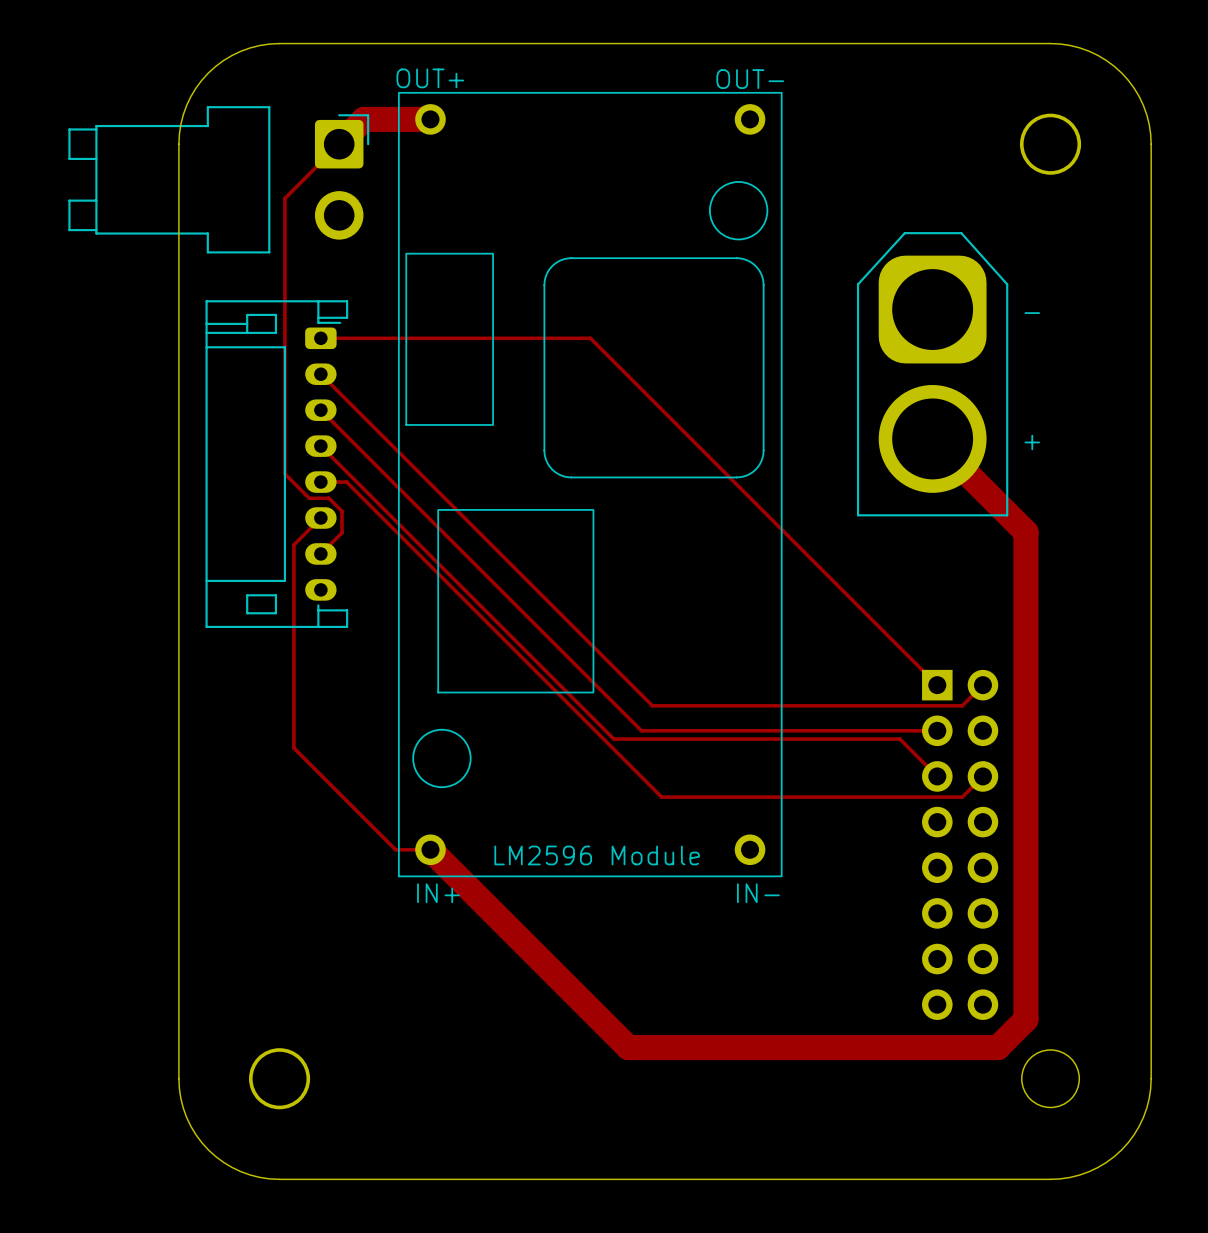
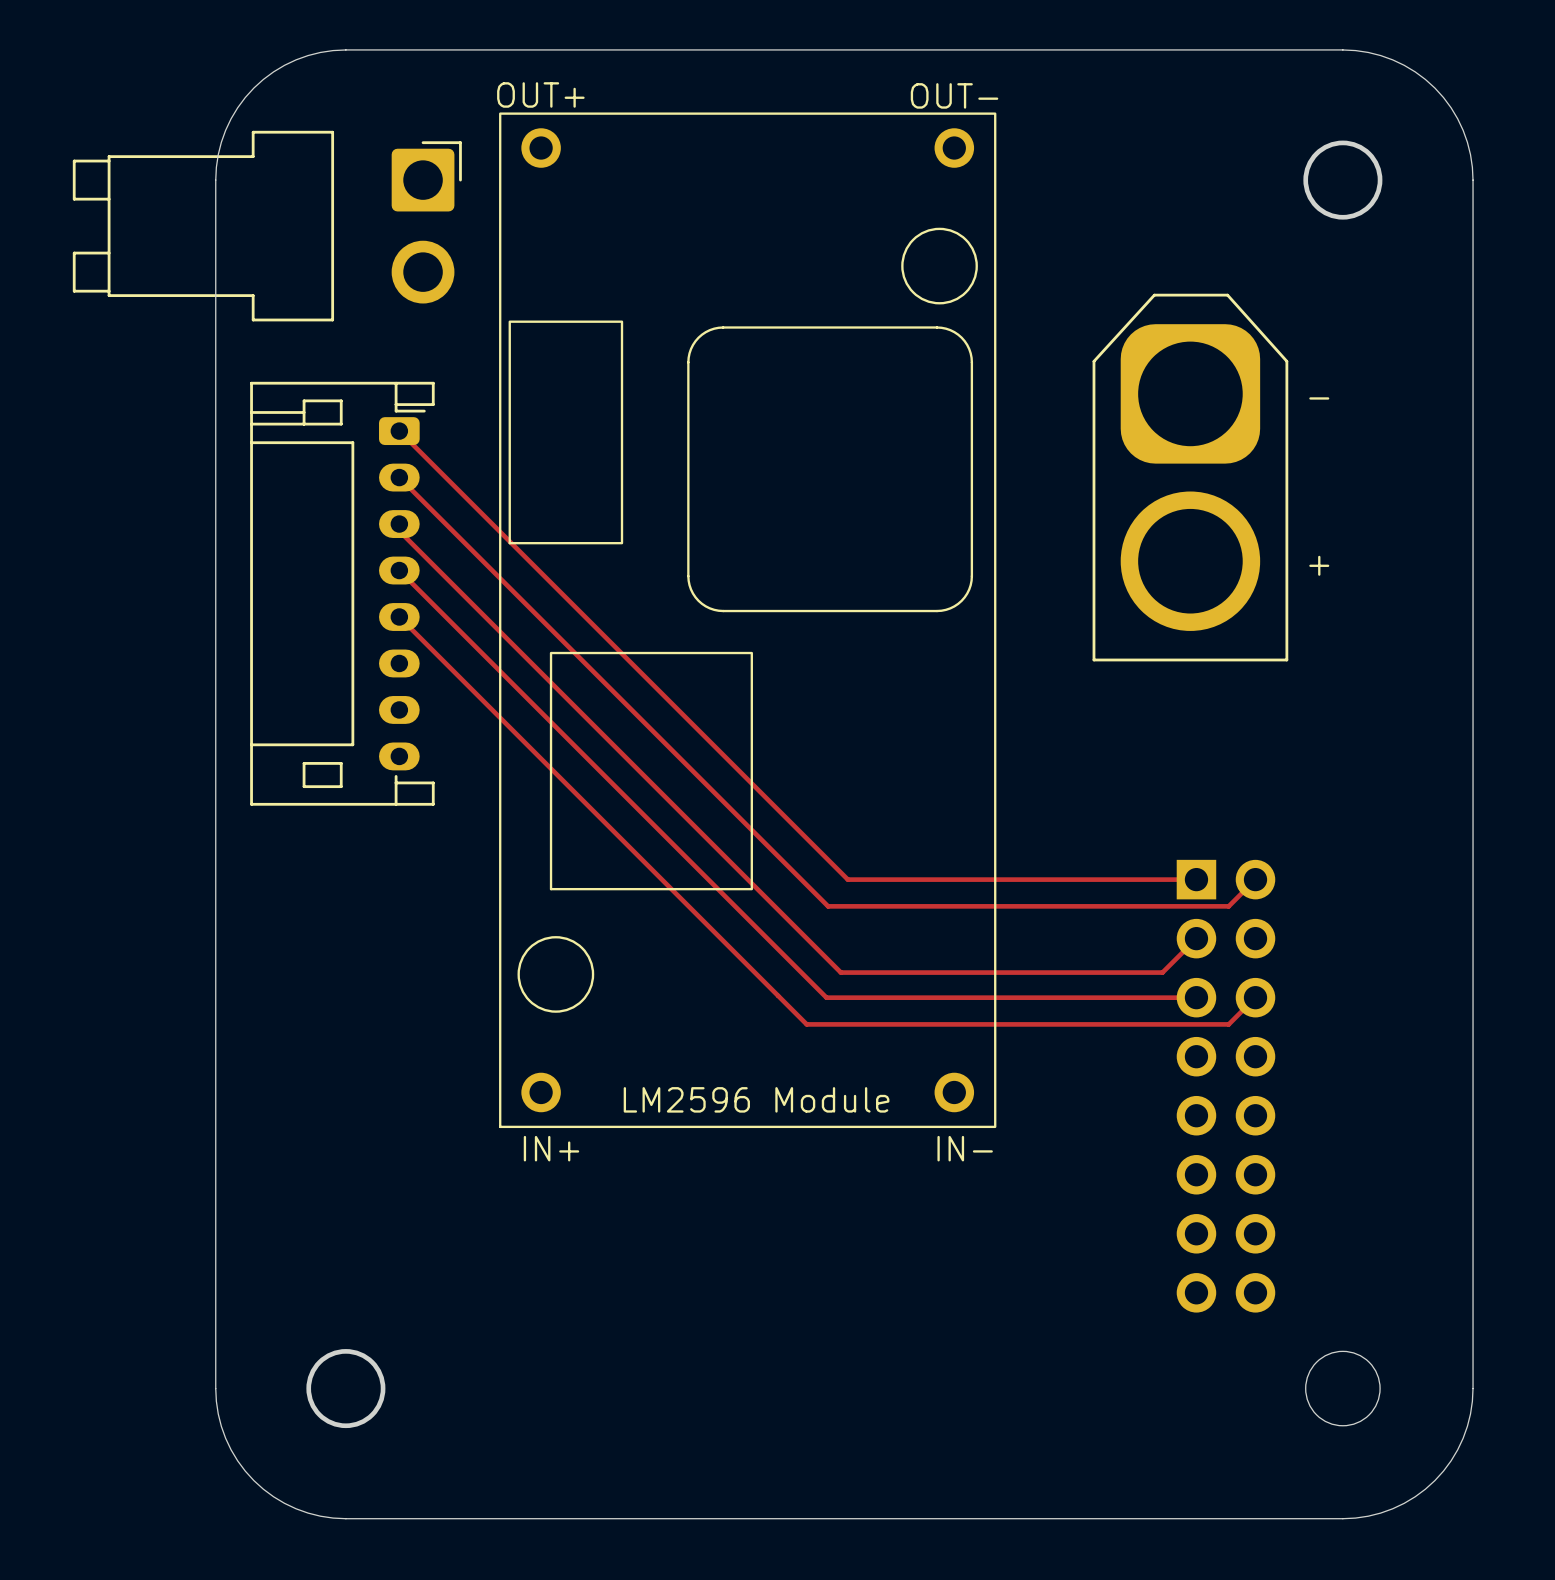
track: (430, 119) (364, 119) (284, 198) (284, 473) (309, 498) (328, 498) (342, 511) (342, 532) (320, 553) -> none
track: (320, 338) (590, 338) (937, 685) -> (399, 431) (847, 879) (1196, 879)
track: (320, 410) (641, 730) (937, 730) -> (399, 524) (399, 531) (840, 972) (1162, 972) (1196, 938)
track: (932, 438) (1025, 532) (1025, 1019) (997, 1047) (628, 1047) (430, 849) (395, 849) (293, 748) (293, 544) (320, 518) -> none
track: (320, 482) (346, 482) (661, 797) -> (399, 617) (806, 1024) (840, 1024)
track: (613, 739) (899, 739) (937, 776) -> (778, 949) (826, 997) (1196, 997)

